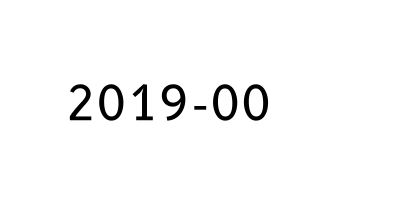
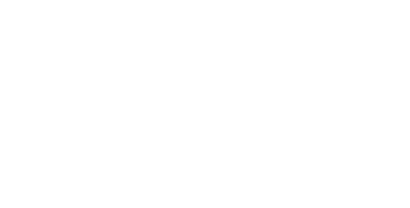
text: 2019-00 (168, 102) -> none

